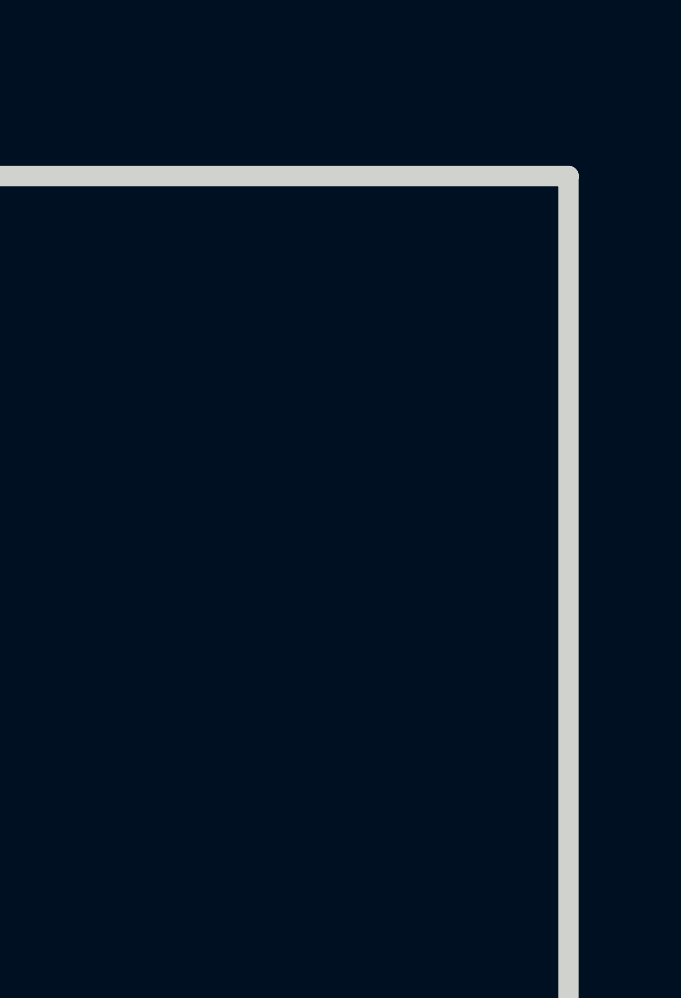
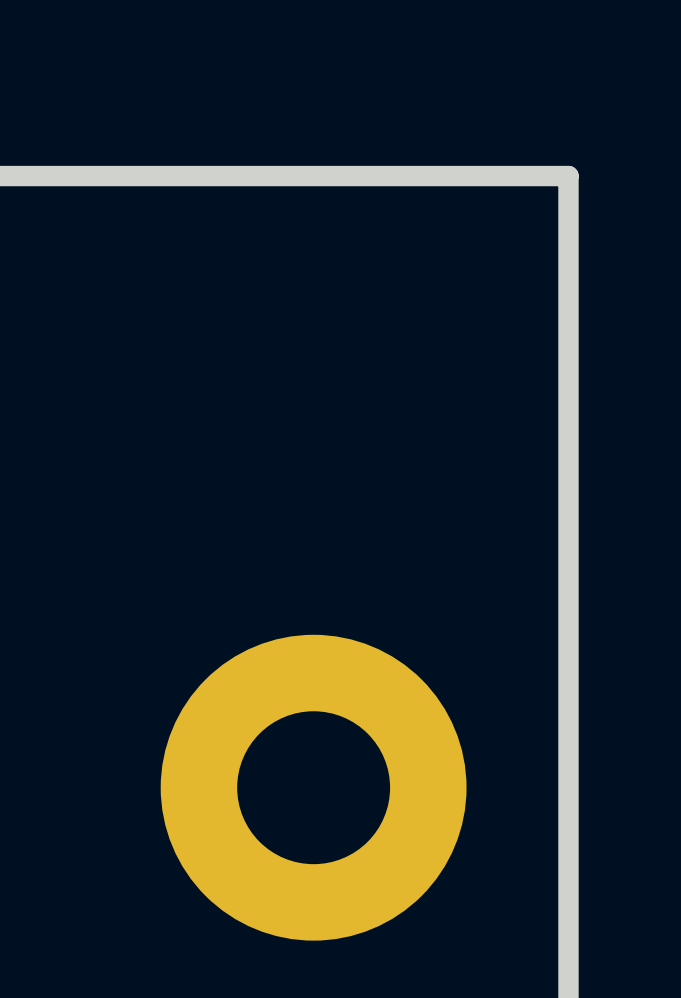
part: none -> (313, 787)

